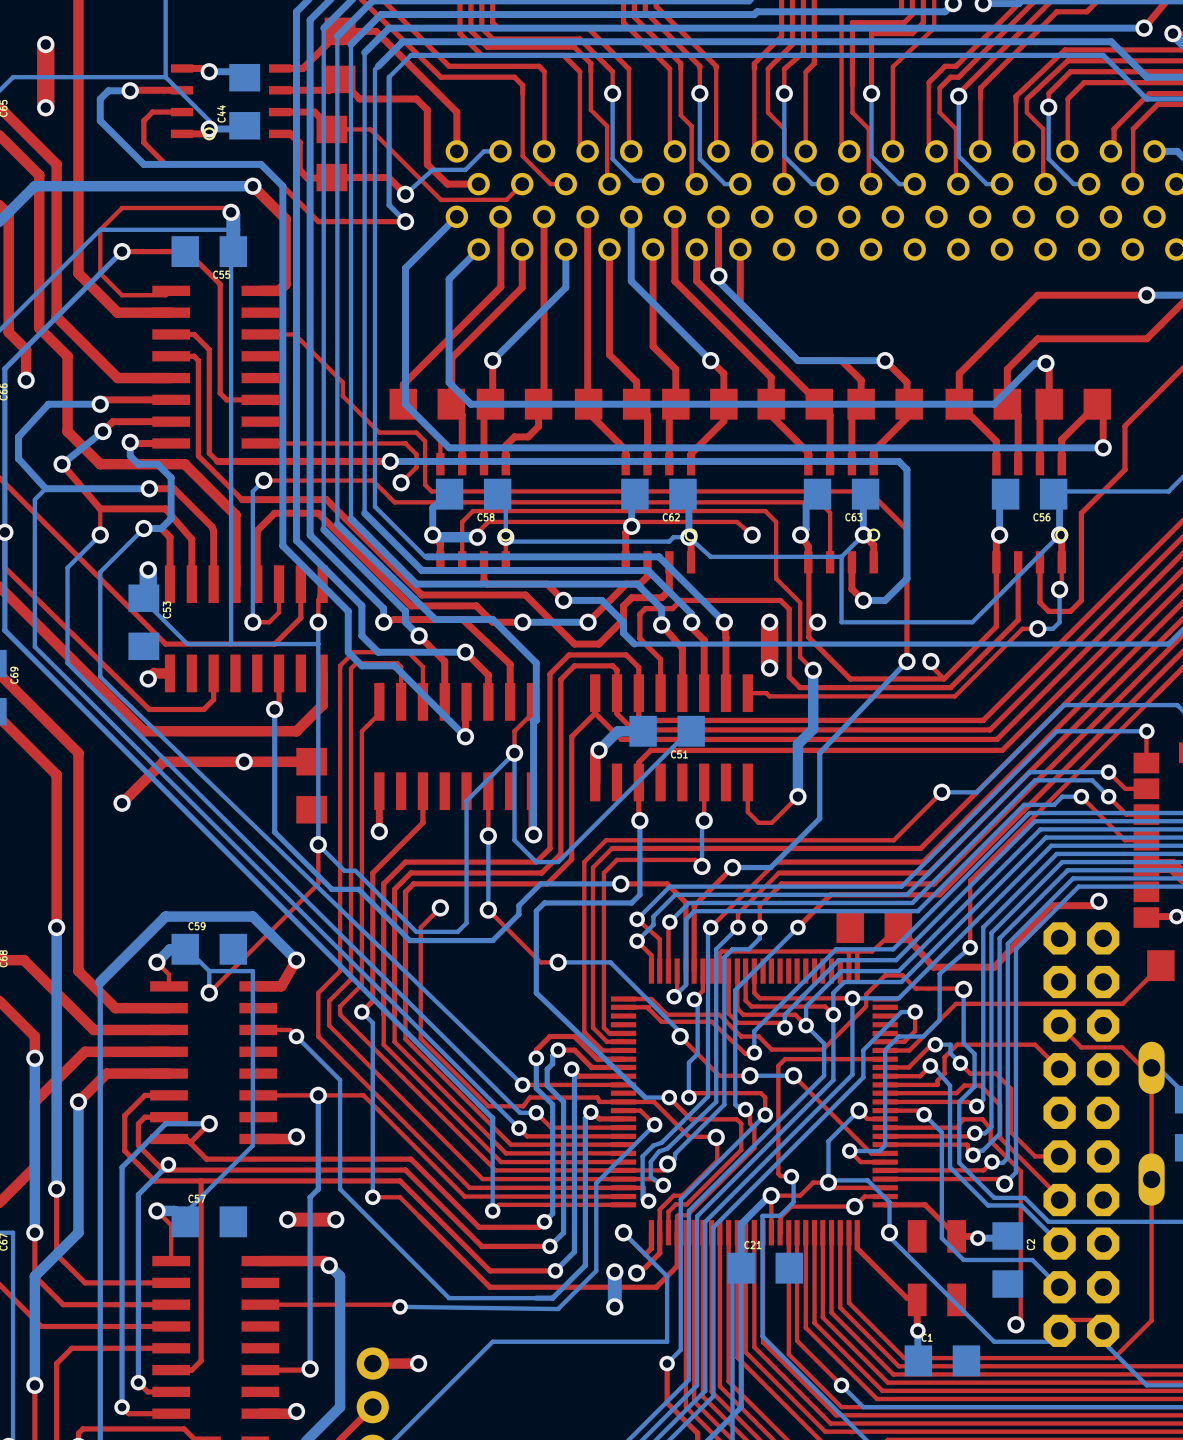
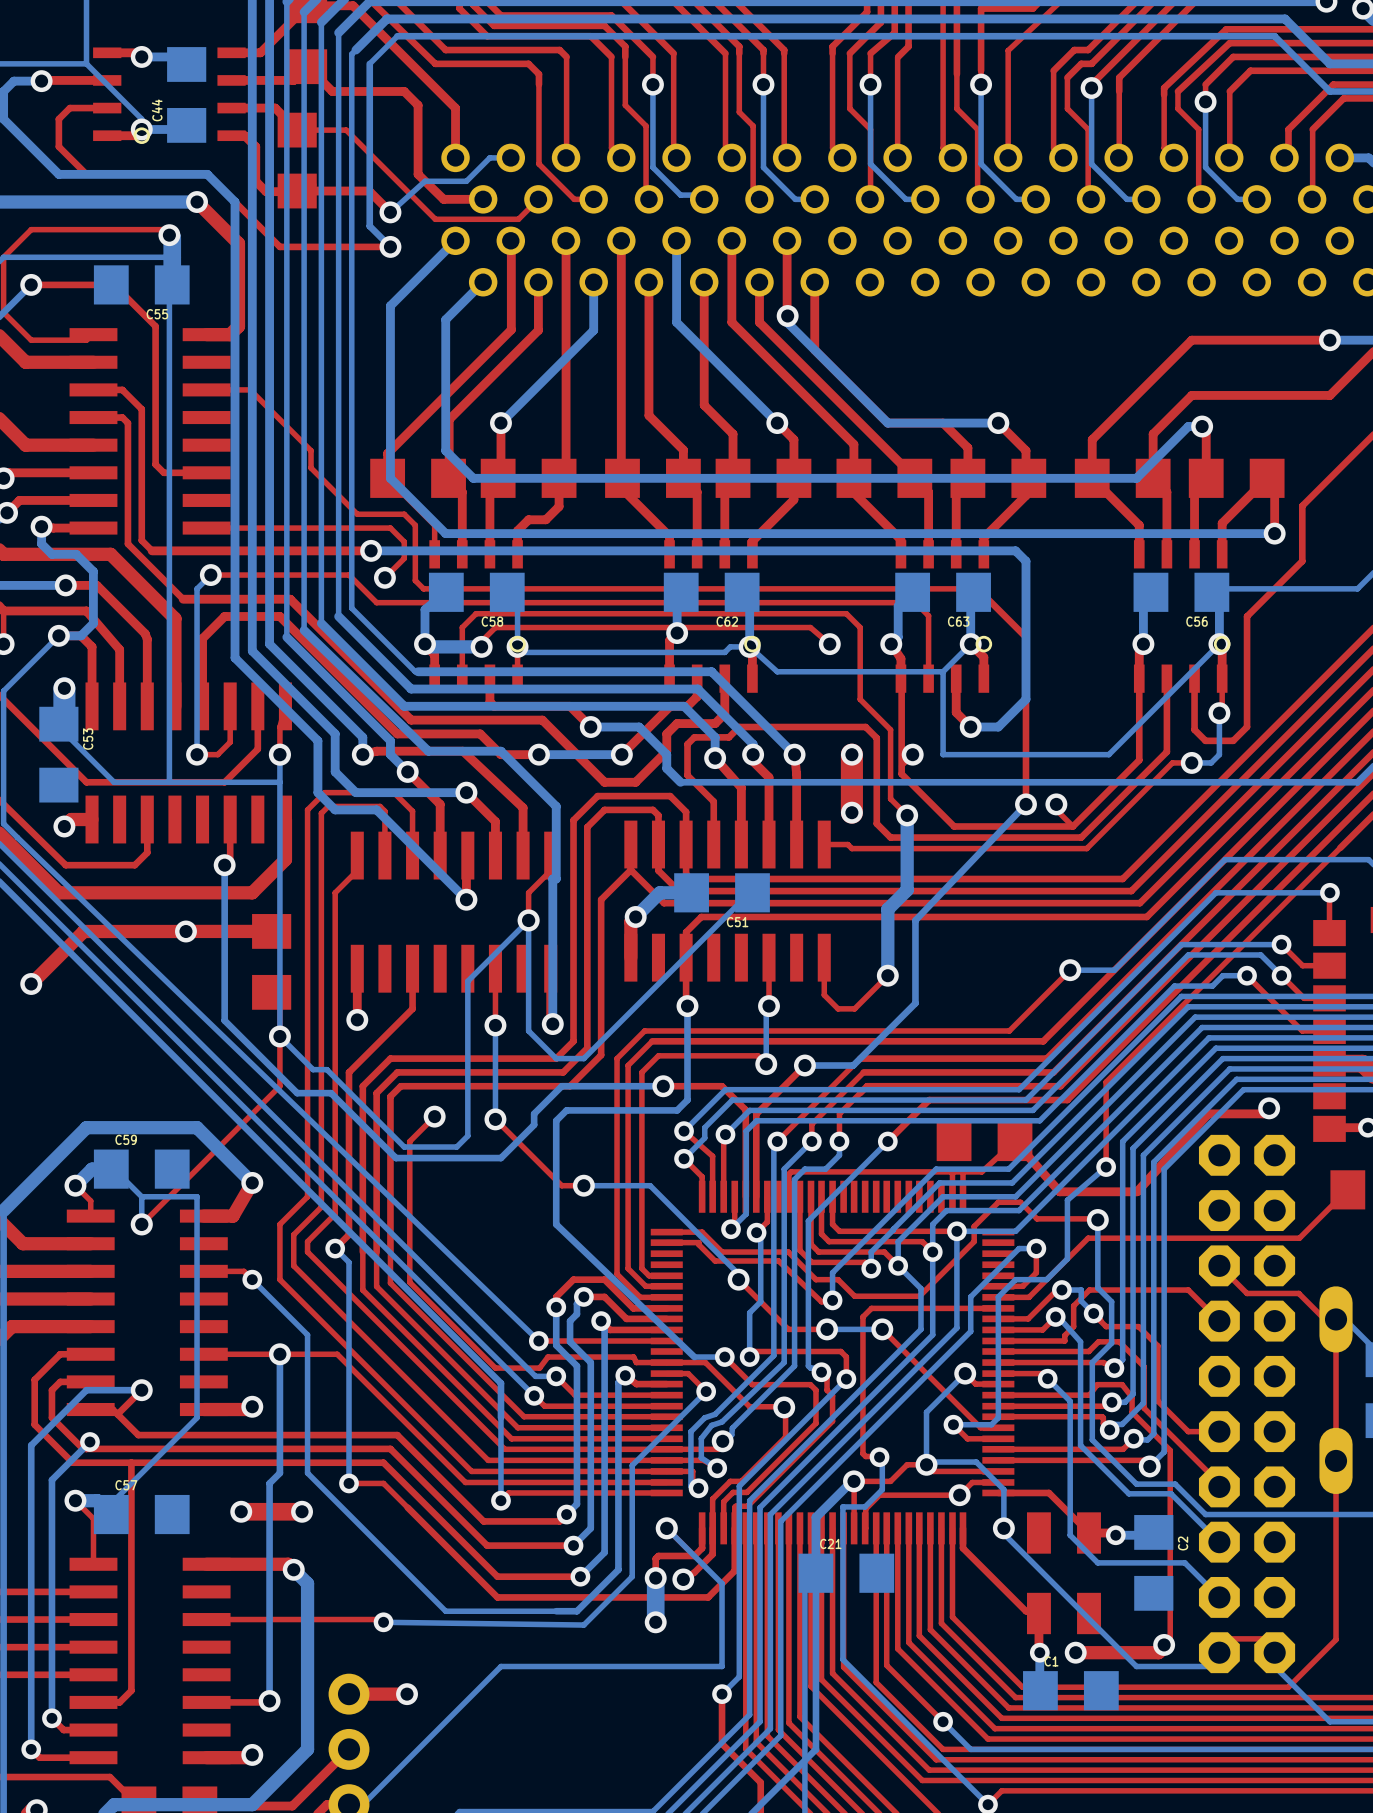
top track: none -> (694, 1555) (658, 1555) (655, 1558) (655, 1578)
top track: none -> (1164, 1644) (1158, 1652) (1075, 1652)
via: none -> (1075, 1652)

